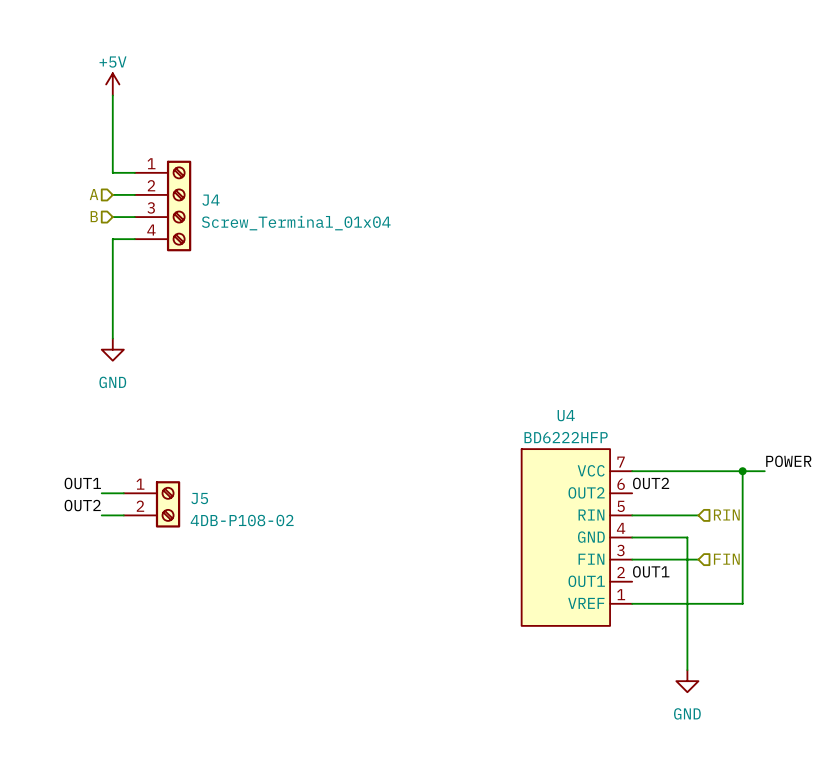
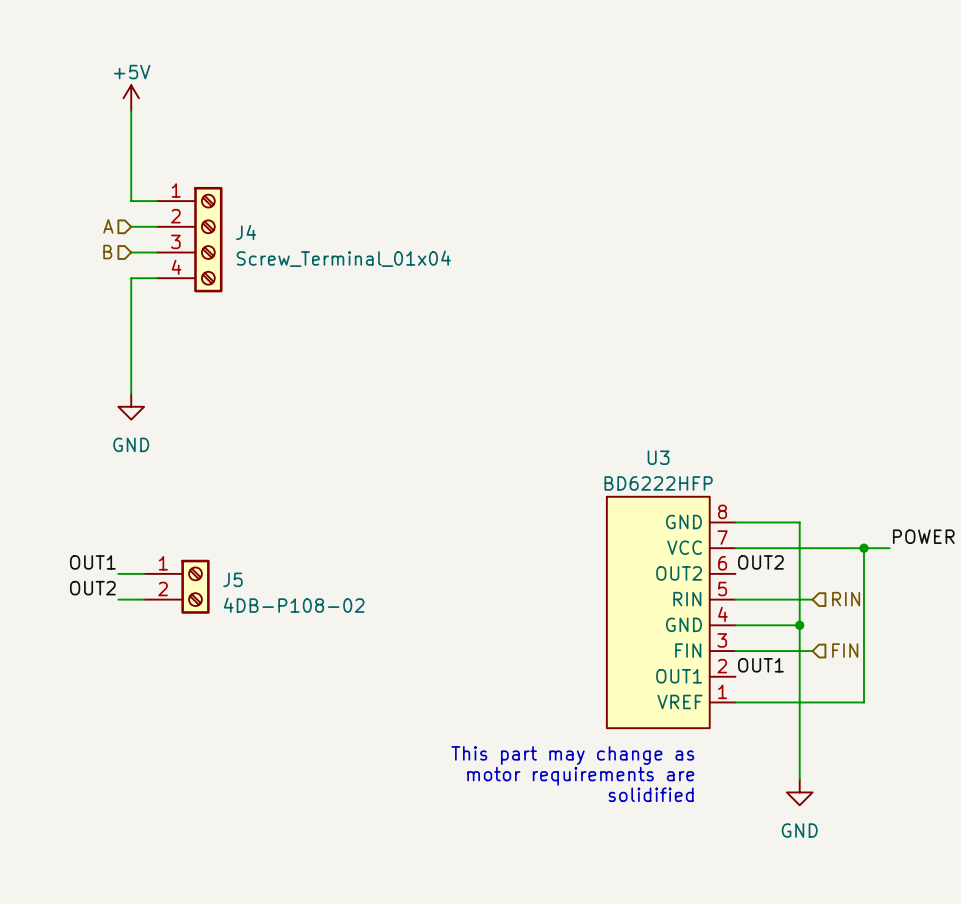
wire: none -> (735, 522) (799, 522) (799, 625)
U3: none -> BD6222HFP (671, 612)
U4: BD6222HFP (576, 537) -> none
junction: none -> (799, 625)
text: none -> This part may change as (572, 755)
text: none -> motor requirements are (580, 776)
text: none -> solidified (651, 794)

